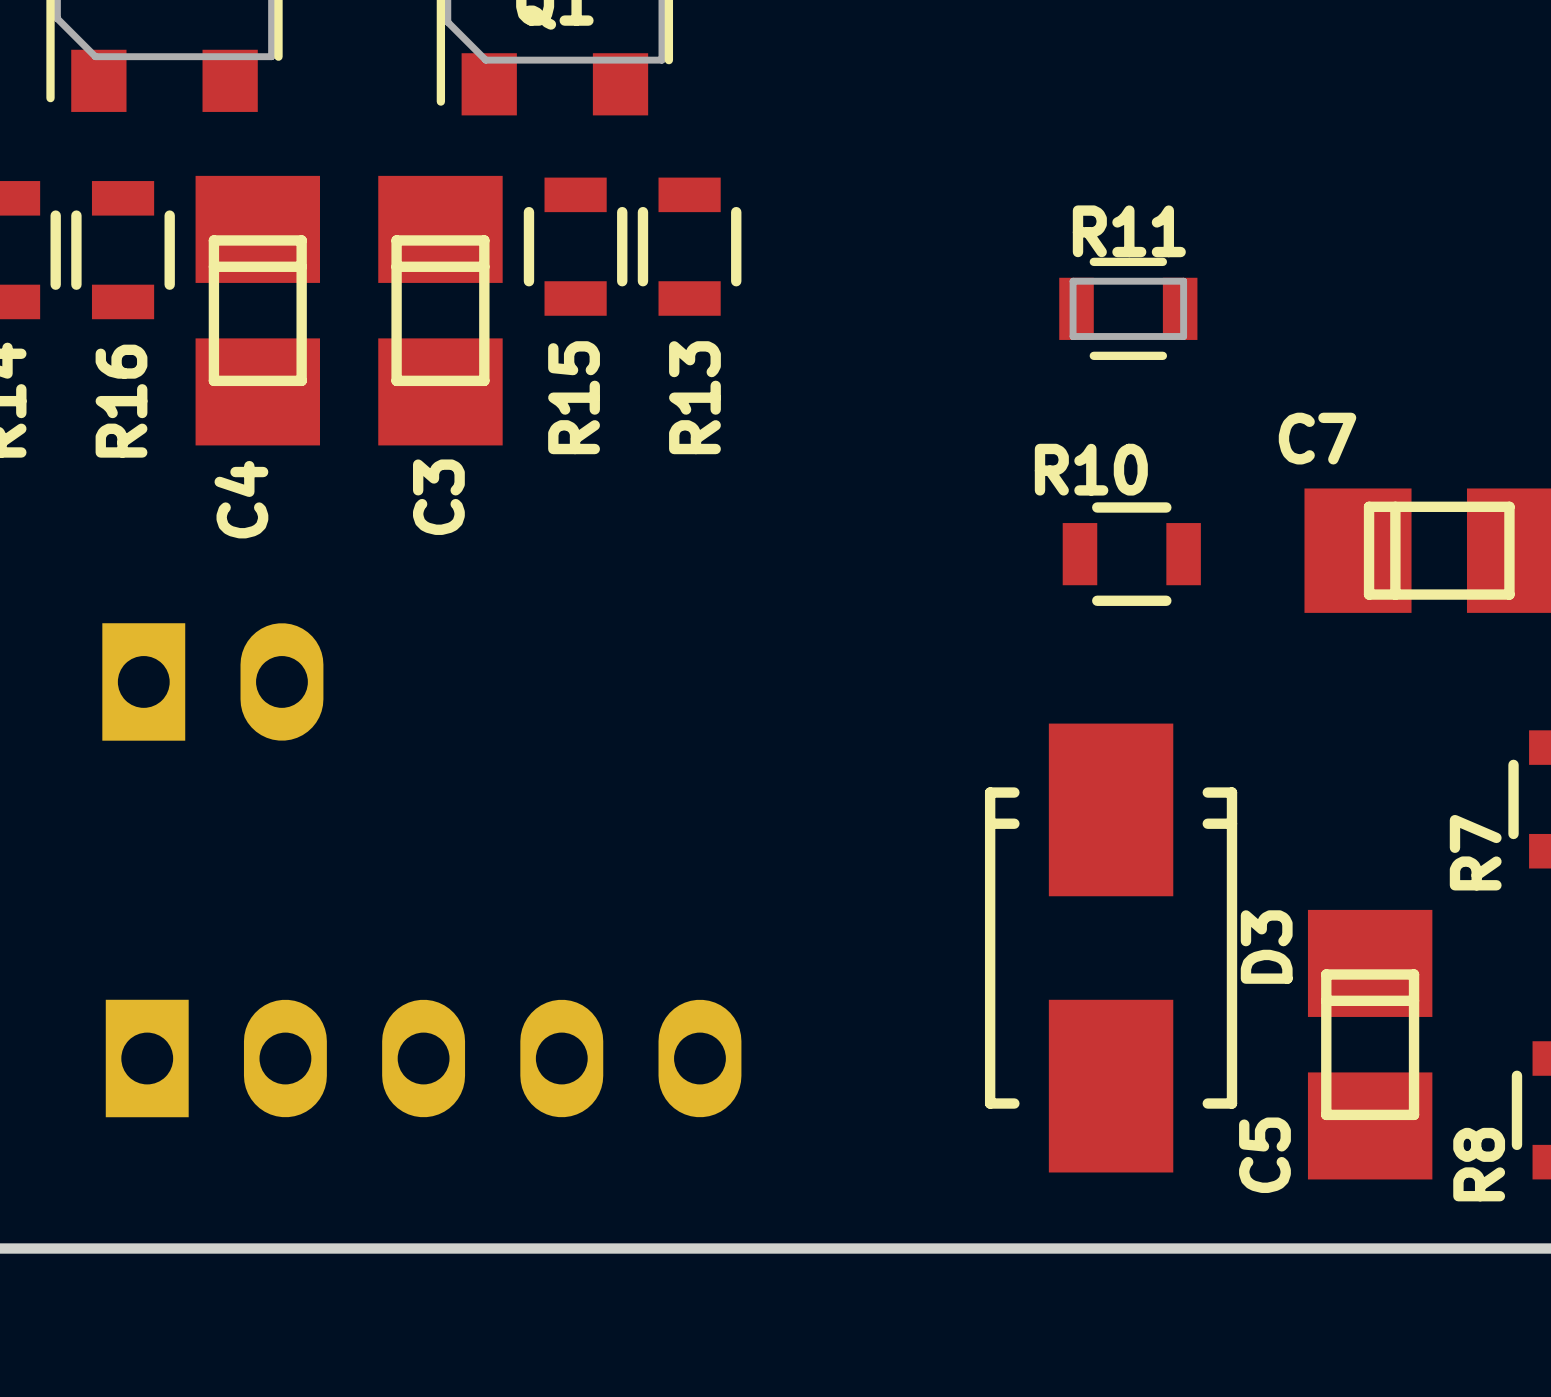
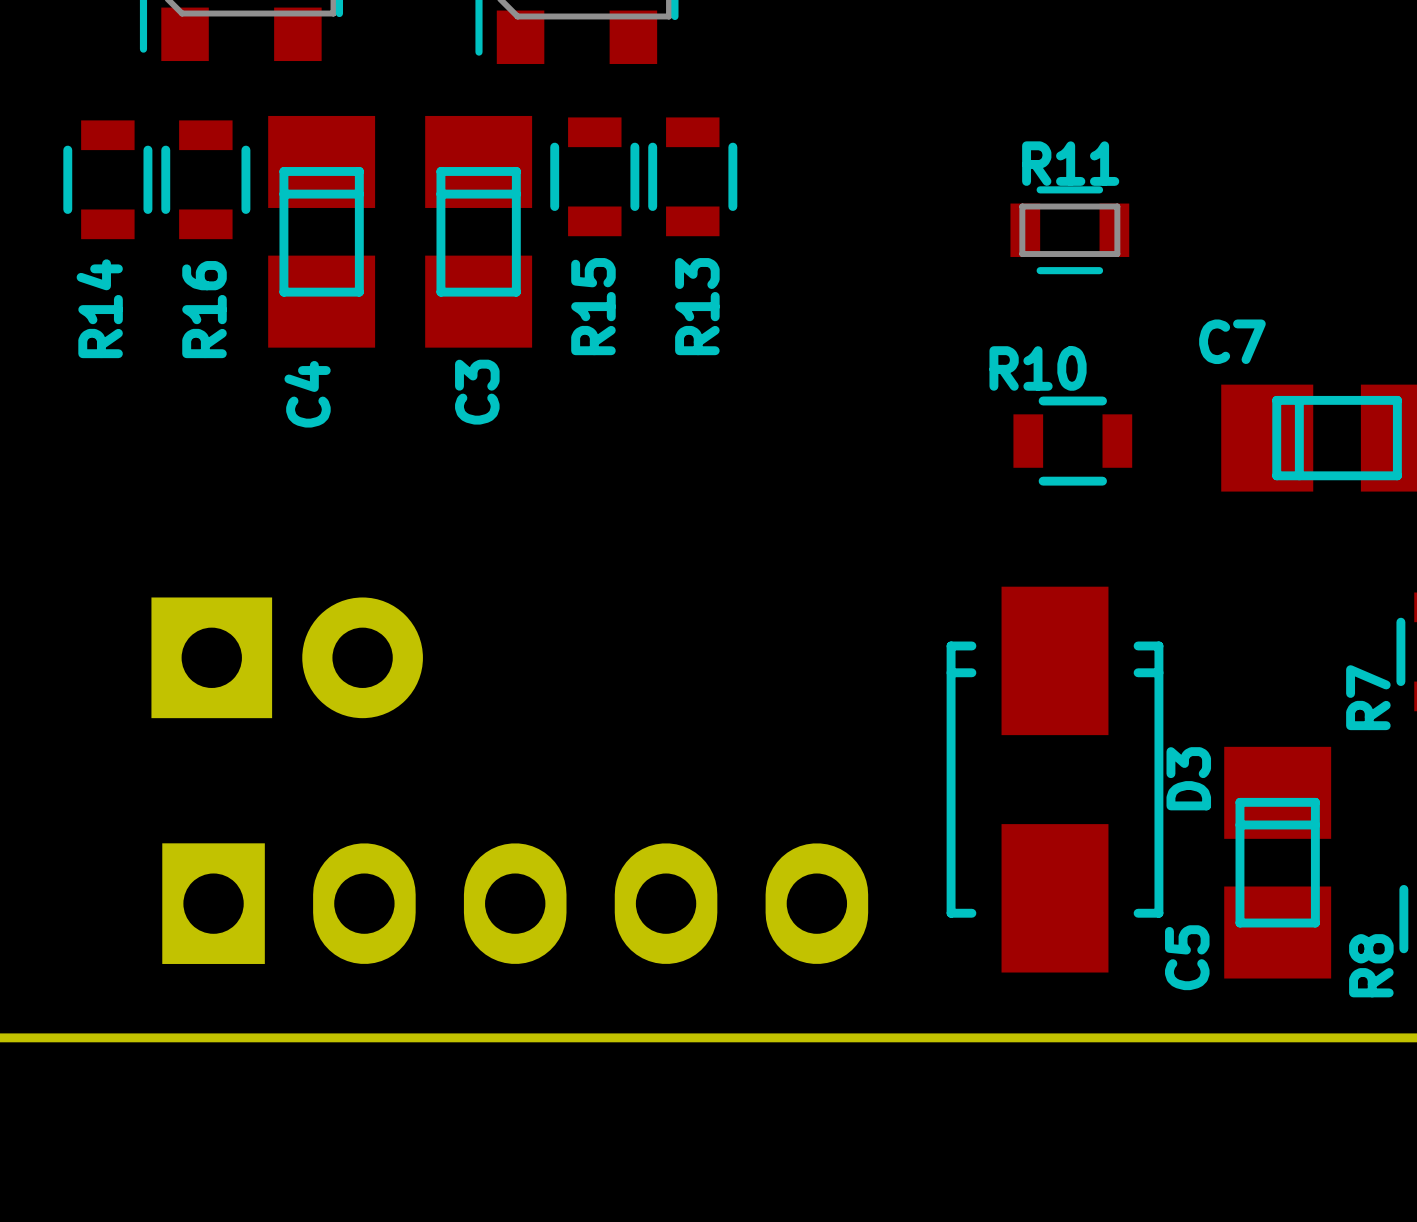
part: (212, 681) -> none
part: none -> (287, 657)
part footprint: [105, 999, 742, 1118] -> [162, 843, 869, 964]

